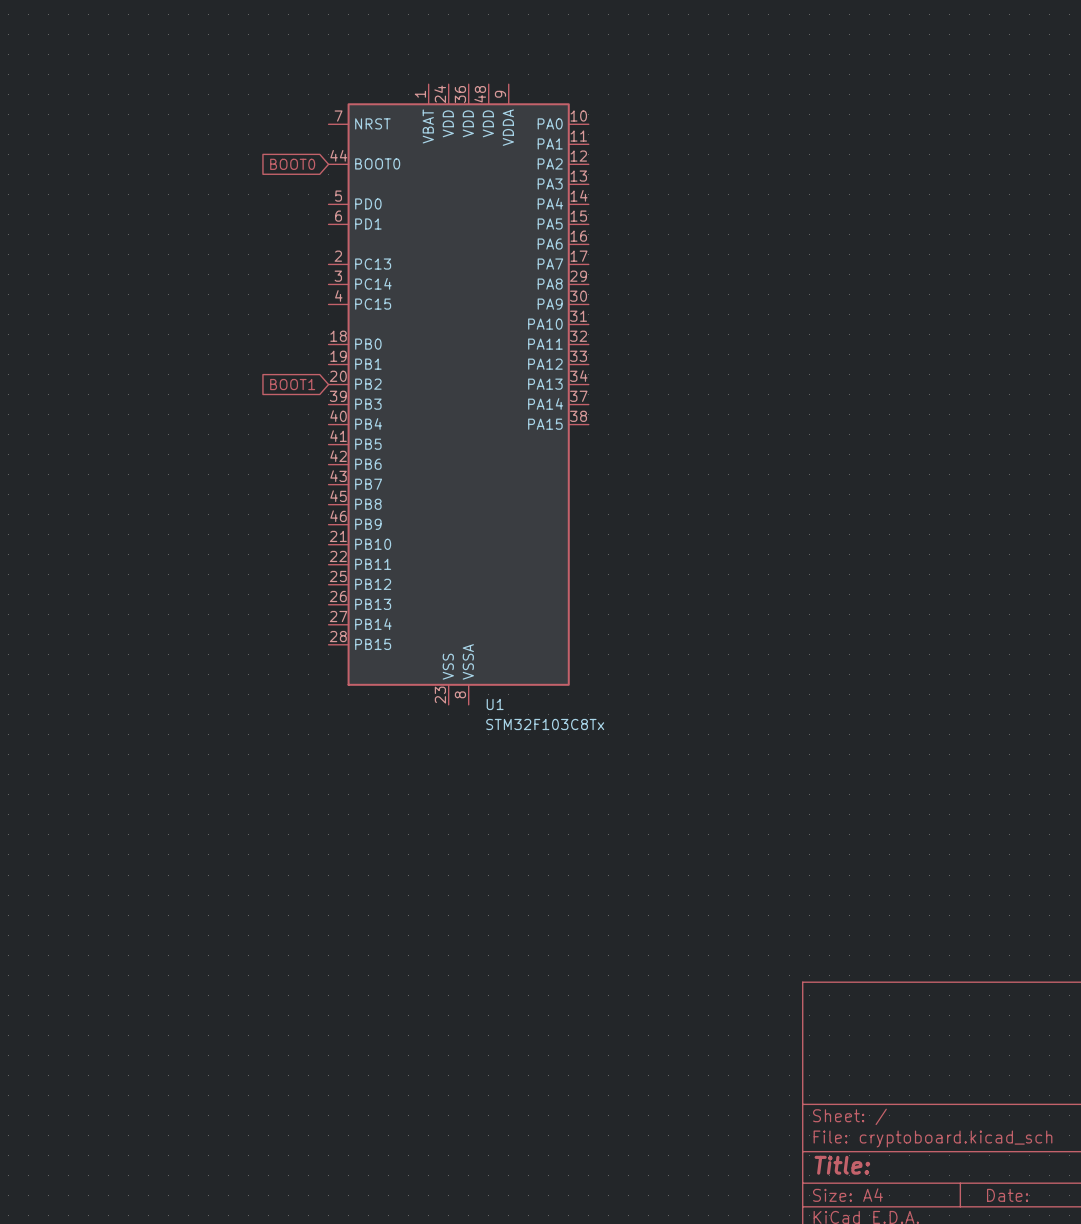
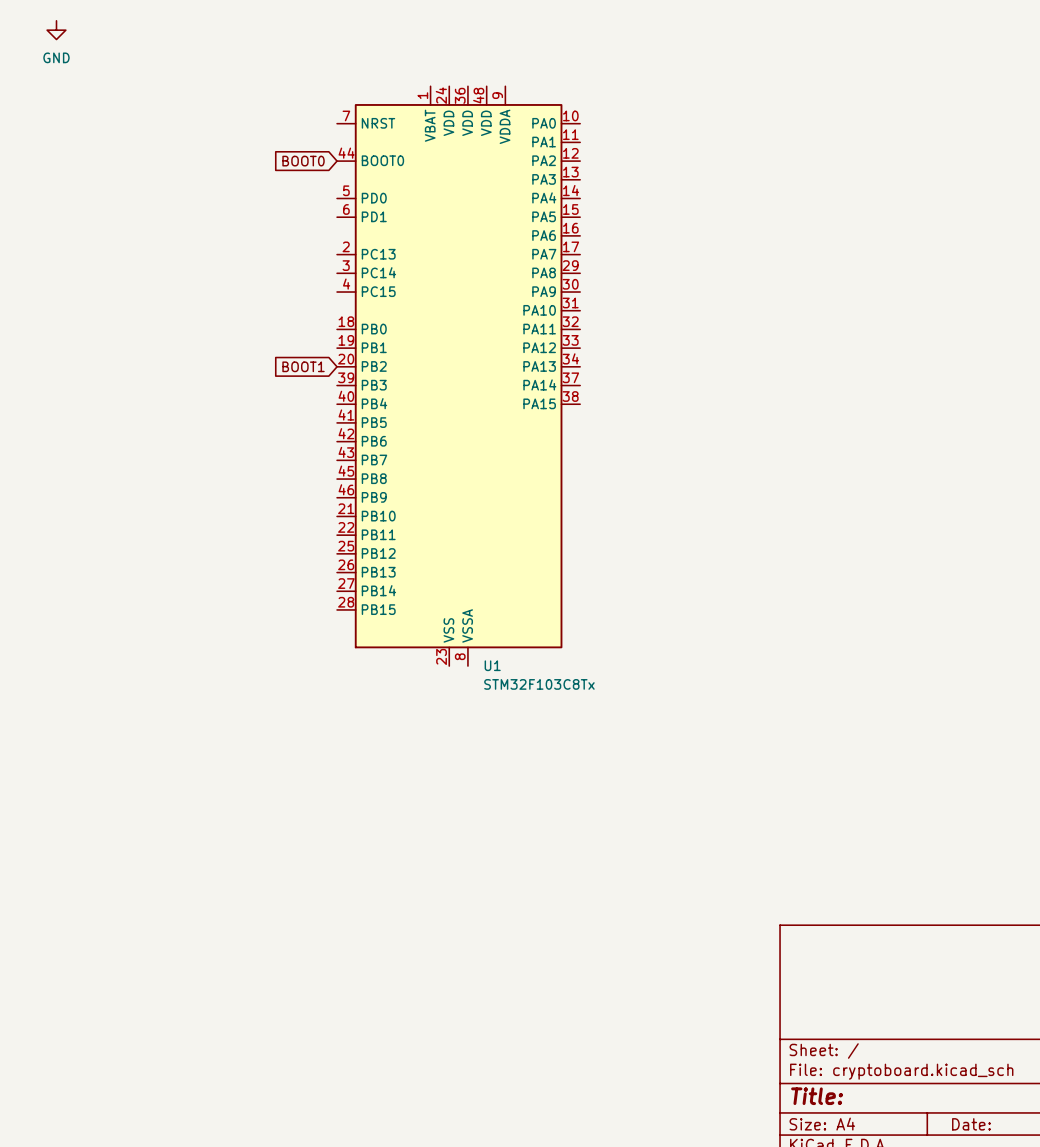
power symbol: none -> GND (56, 30)

